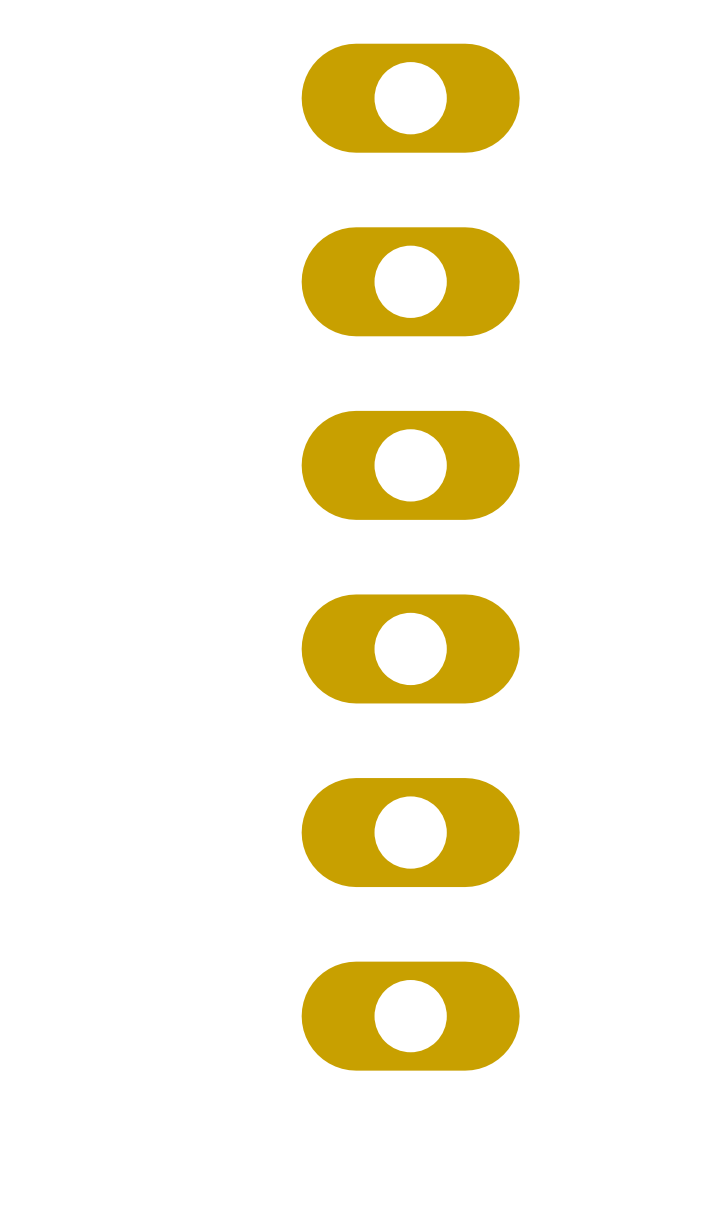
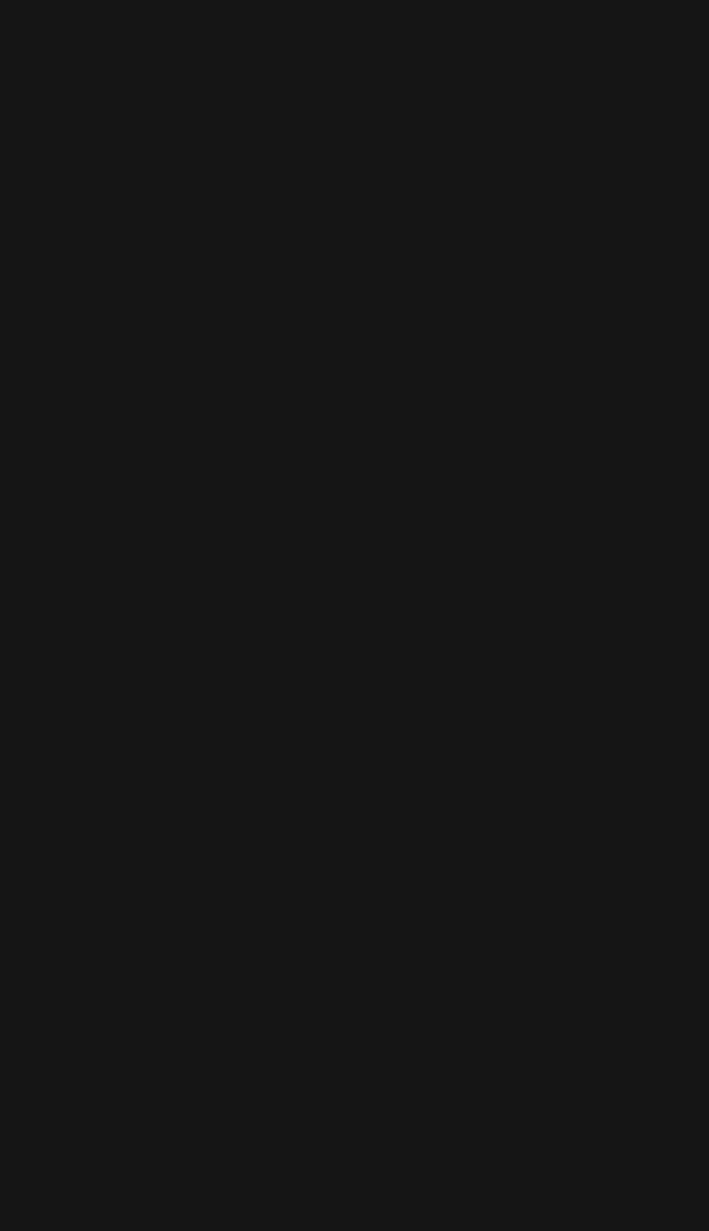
part: (410, 557) -> none

